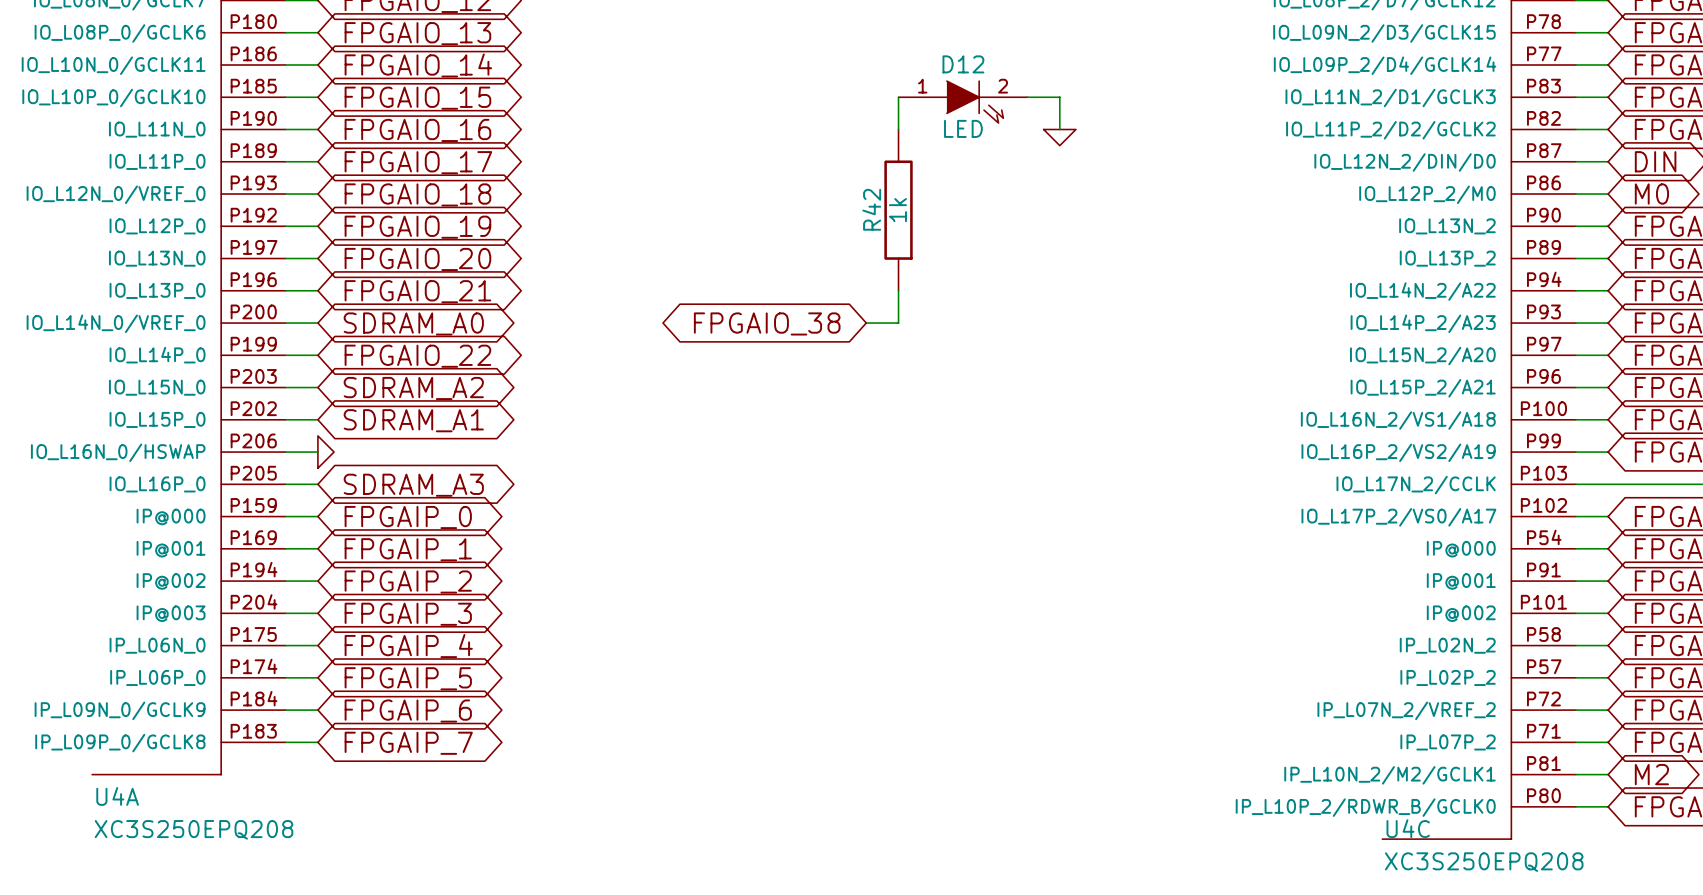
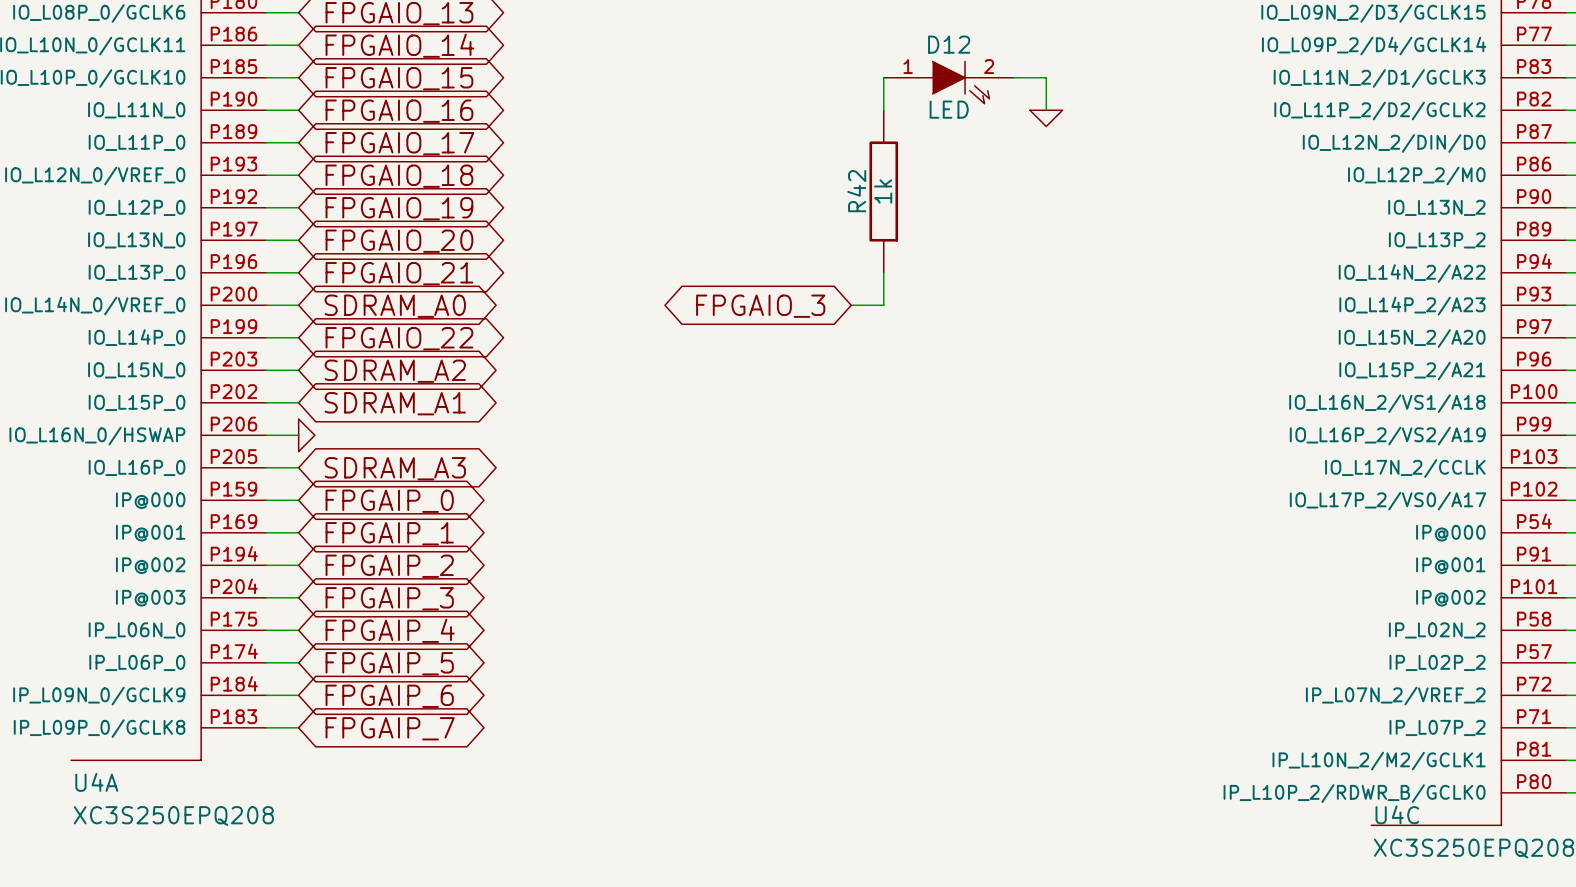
global label: FPGAIO_38 (767, 323) -> FPGAIO_3 (760, 306)

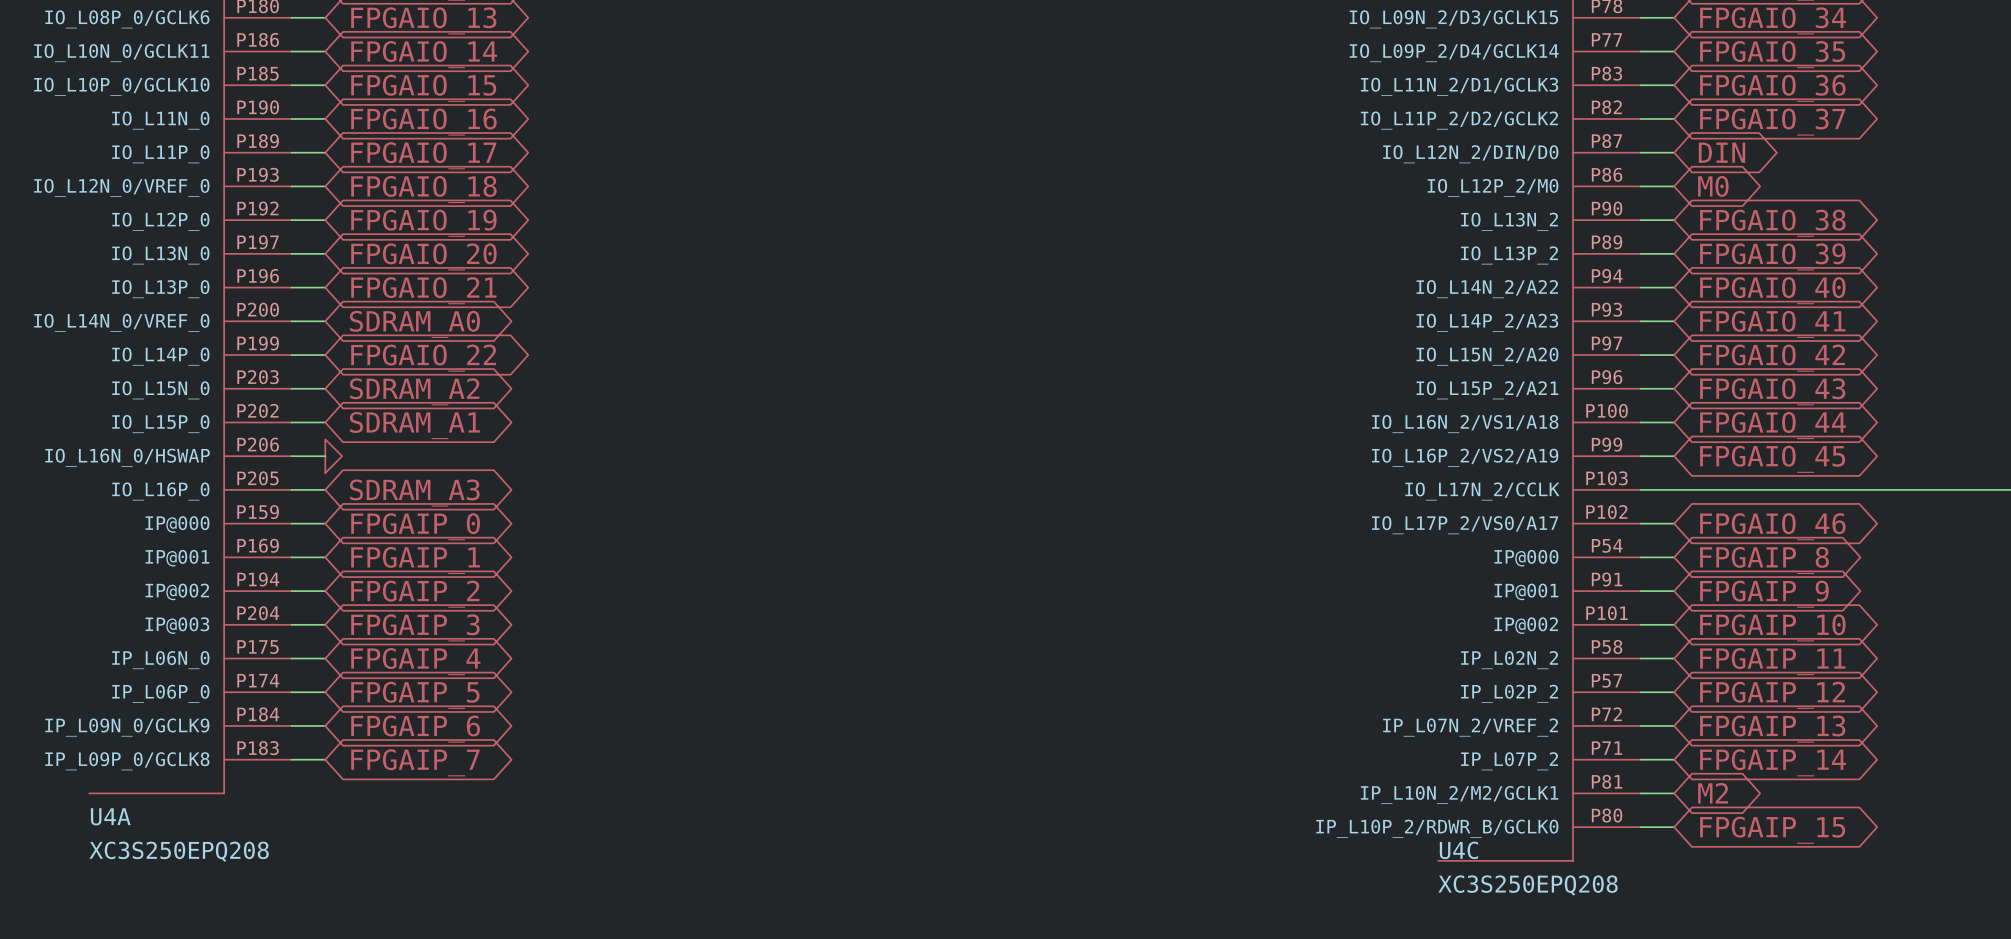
wire: (883, 77) (883, 110) -> none
wire: (1013, 77) (1046, 77) (1046, 110) -> none
D12: LED (948, 82) -> none
power symbol: (1046, 118) -> none
R42: 1k (883, 191) -> none
wire: (883, 272) (883, 305) (851, 305) -> none
global label: FPGAIO_3 (760, 306) -> none

